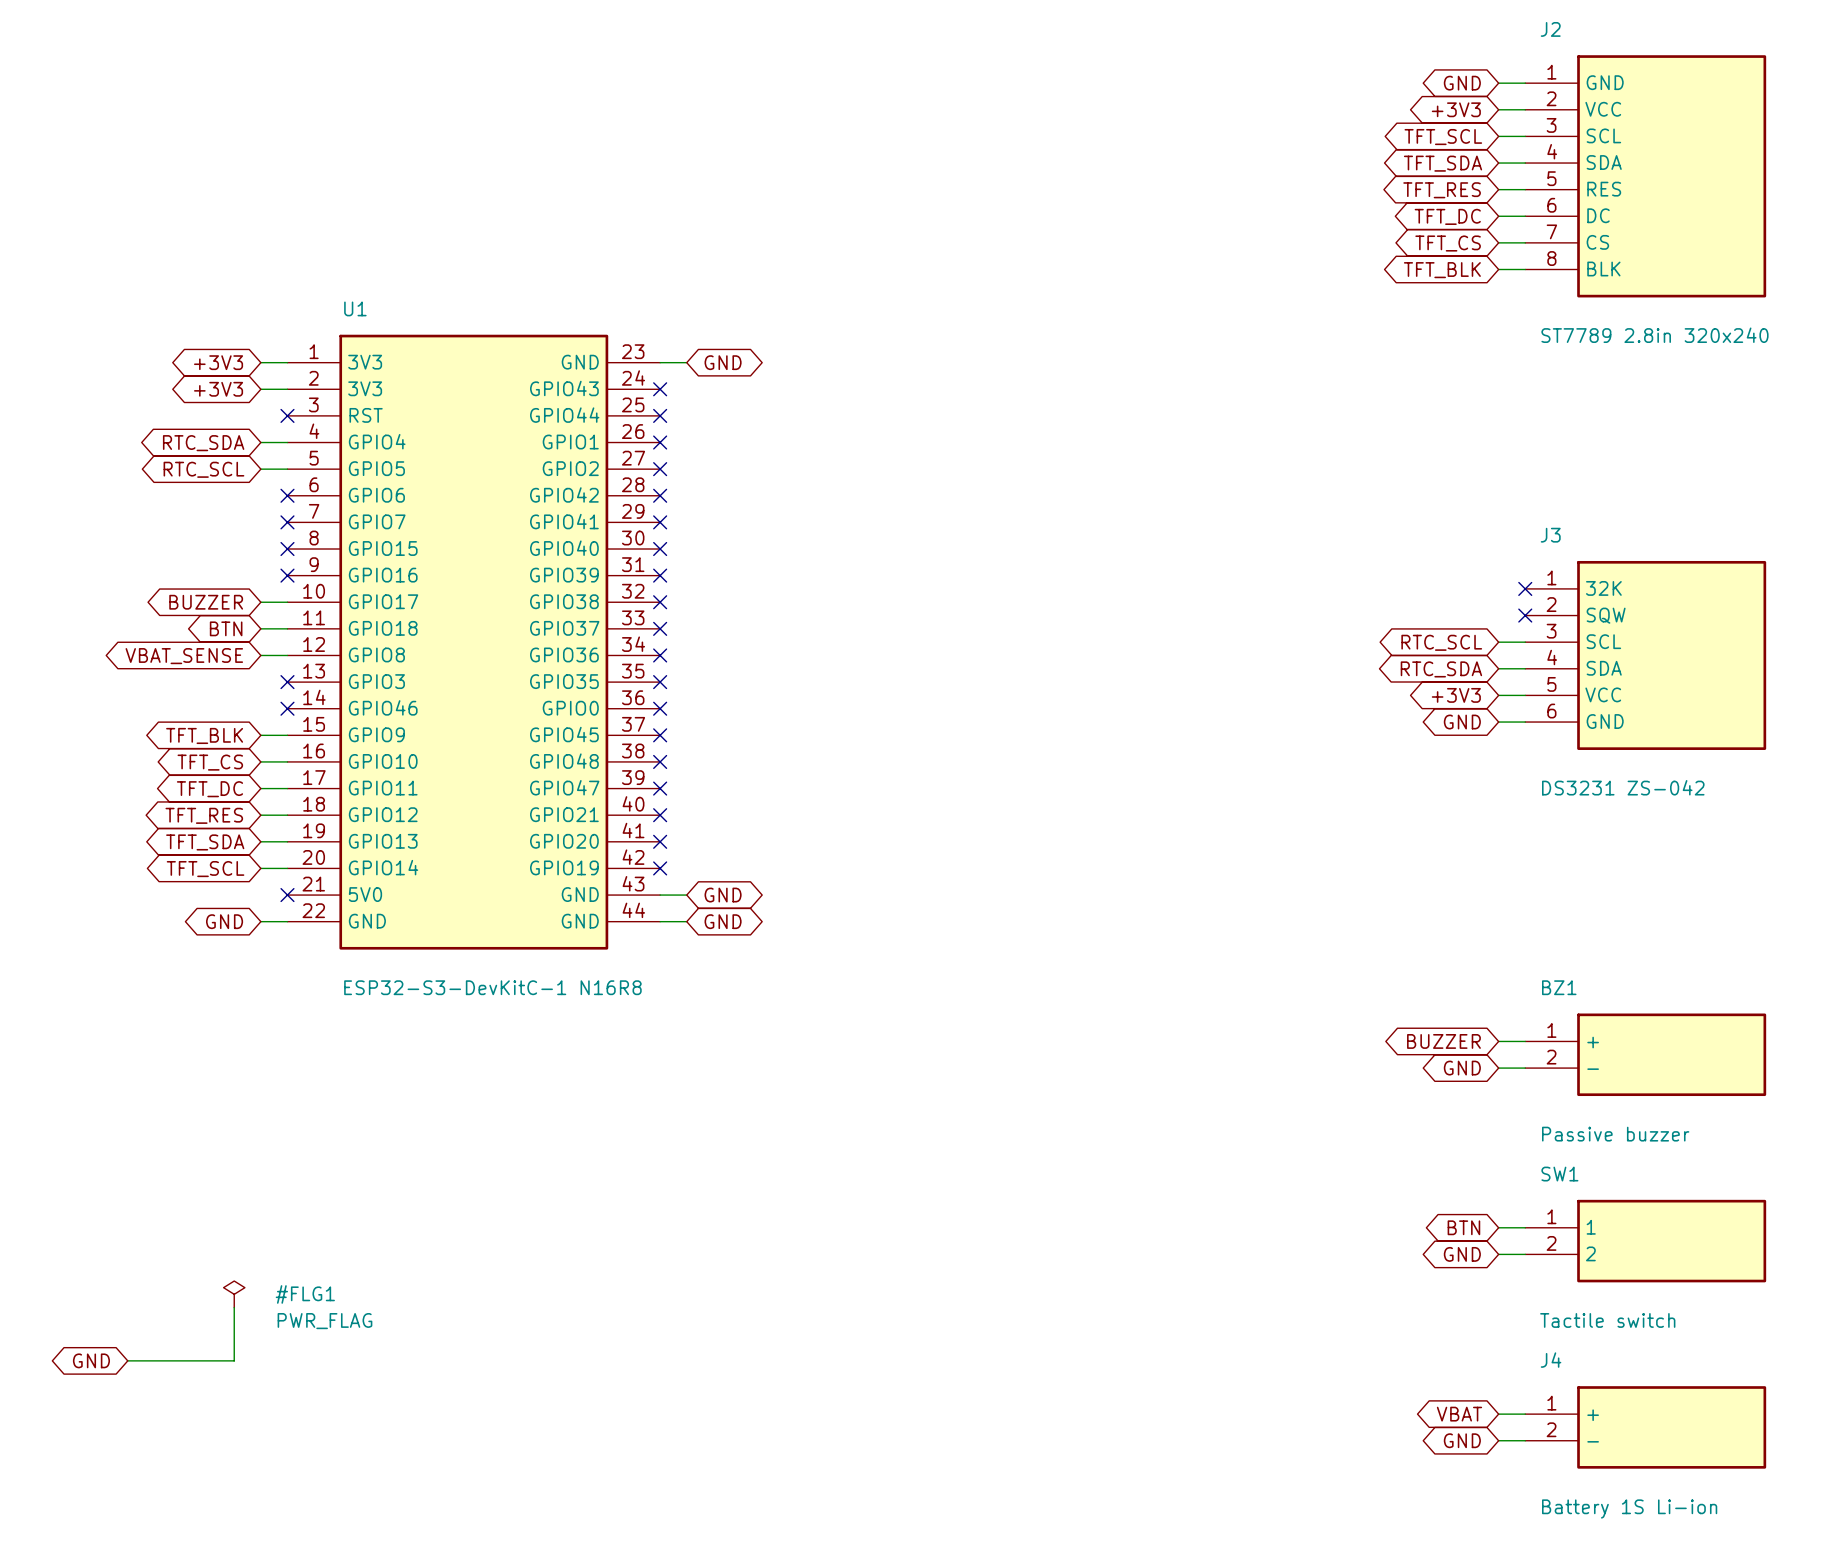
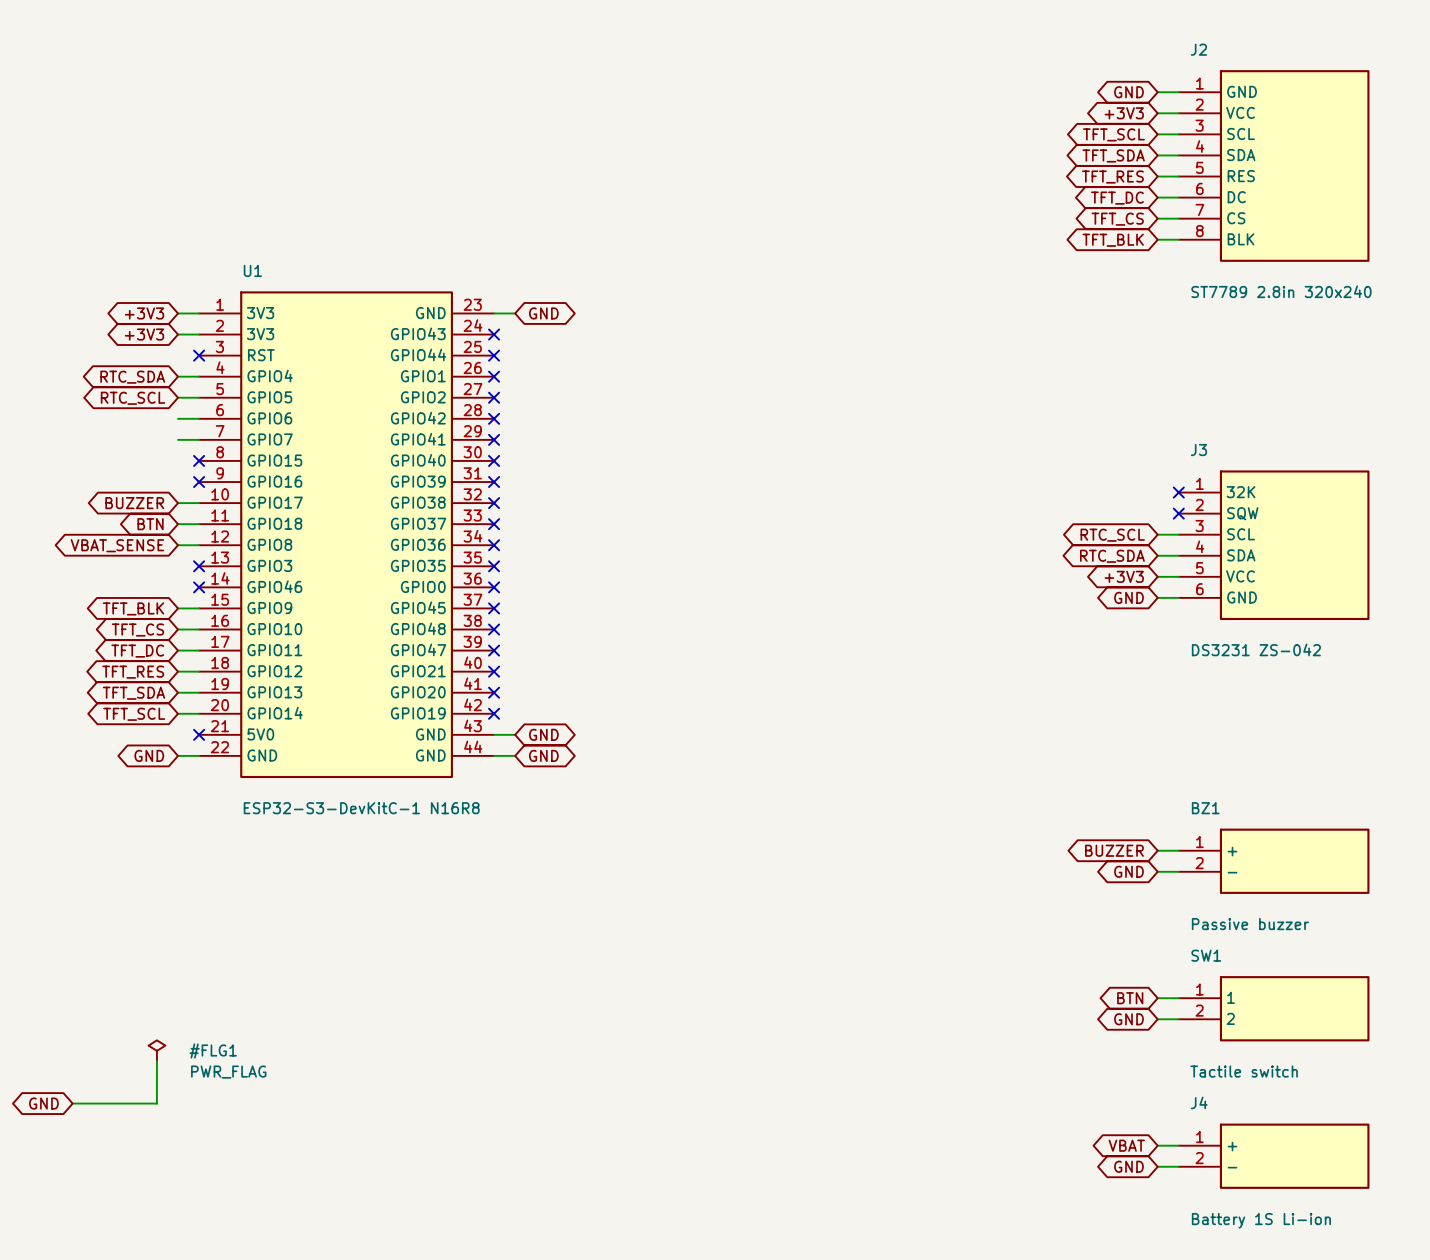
wire: none -> (178, 418) (199, 418)
no-connect mark: (287, 495) -> none
wire: none -> (178, 439) (199, 439)
no-connect mark: (287, 522) -> none

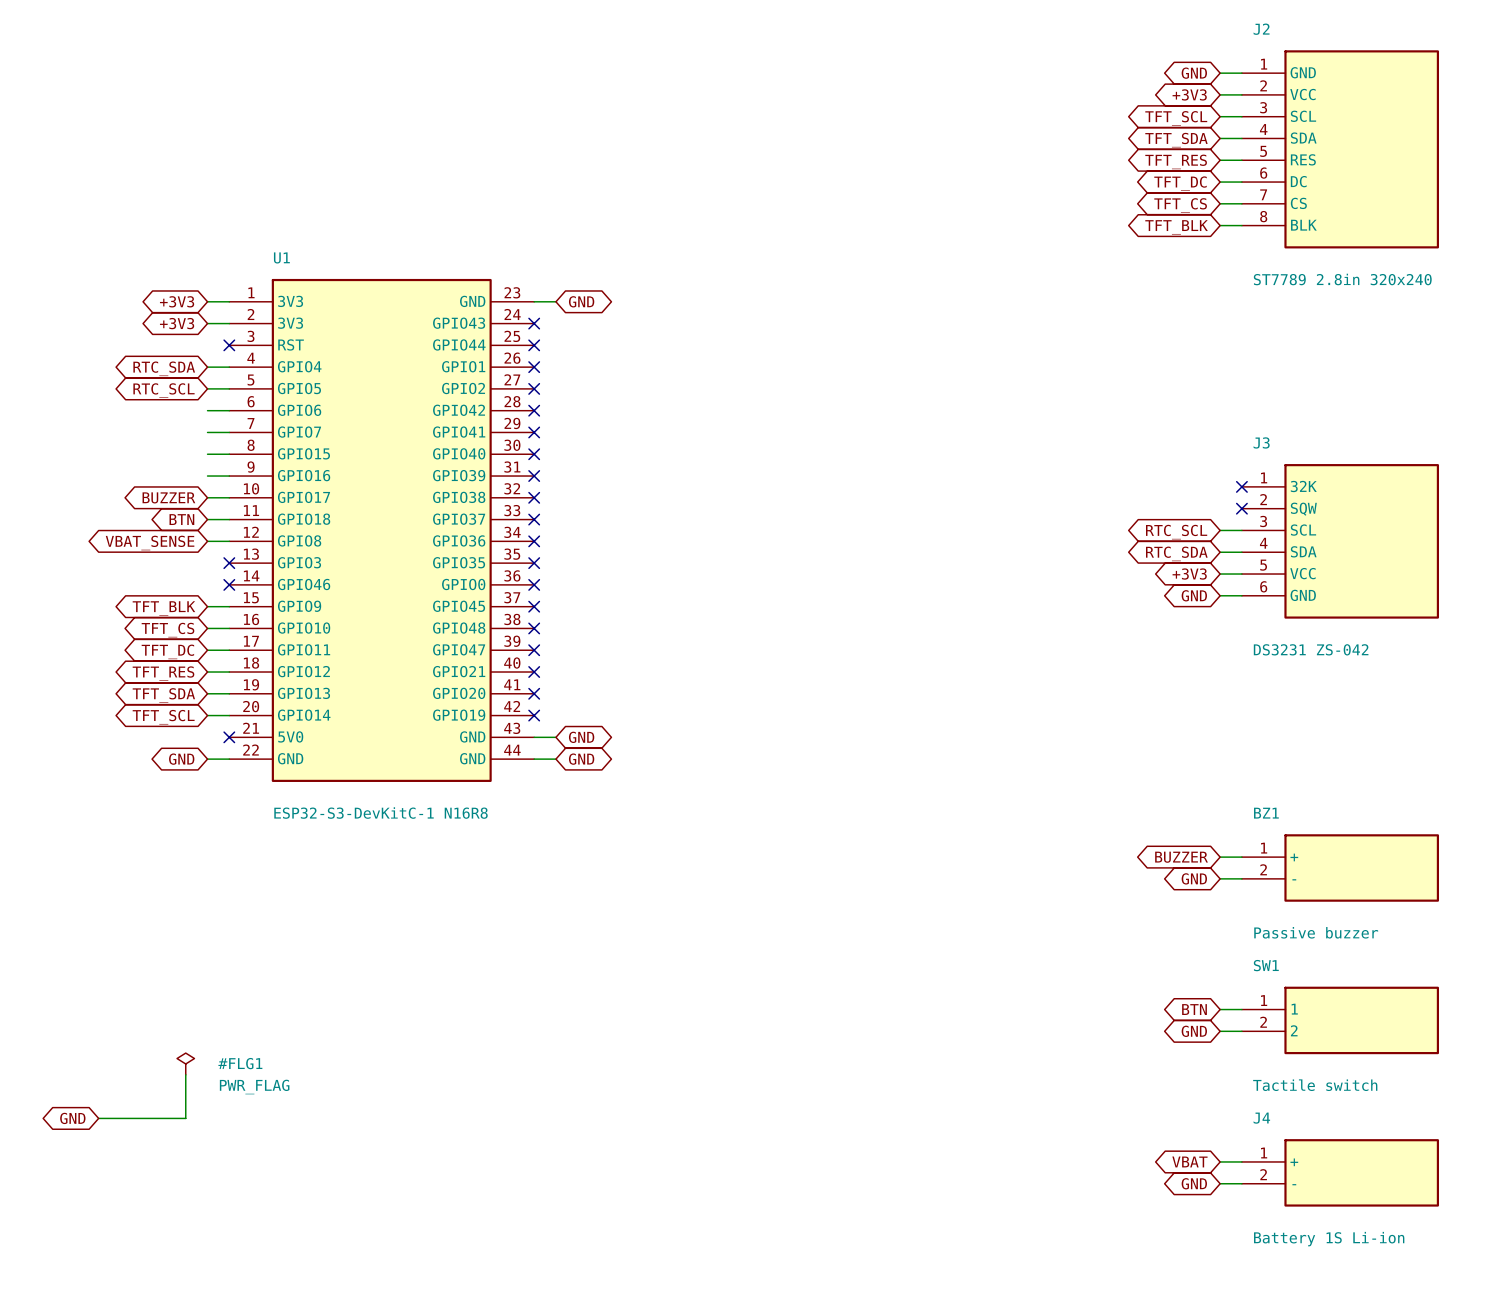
wire: none -> (207, 454) (229, 454)
no-connect mark: (199, 460) -> none
wire: none -> (207, 476) (229, 476)
no-connect mark: (199, 482) -> none

